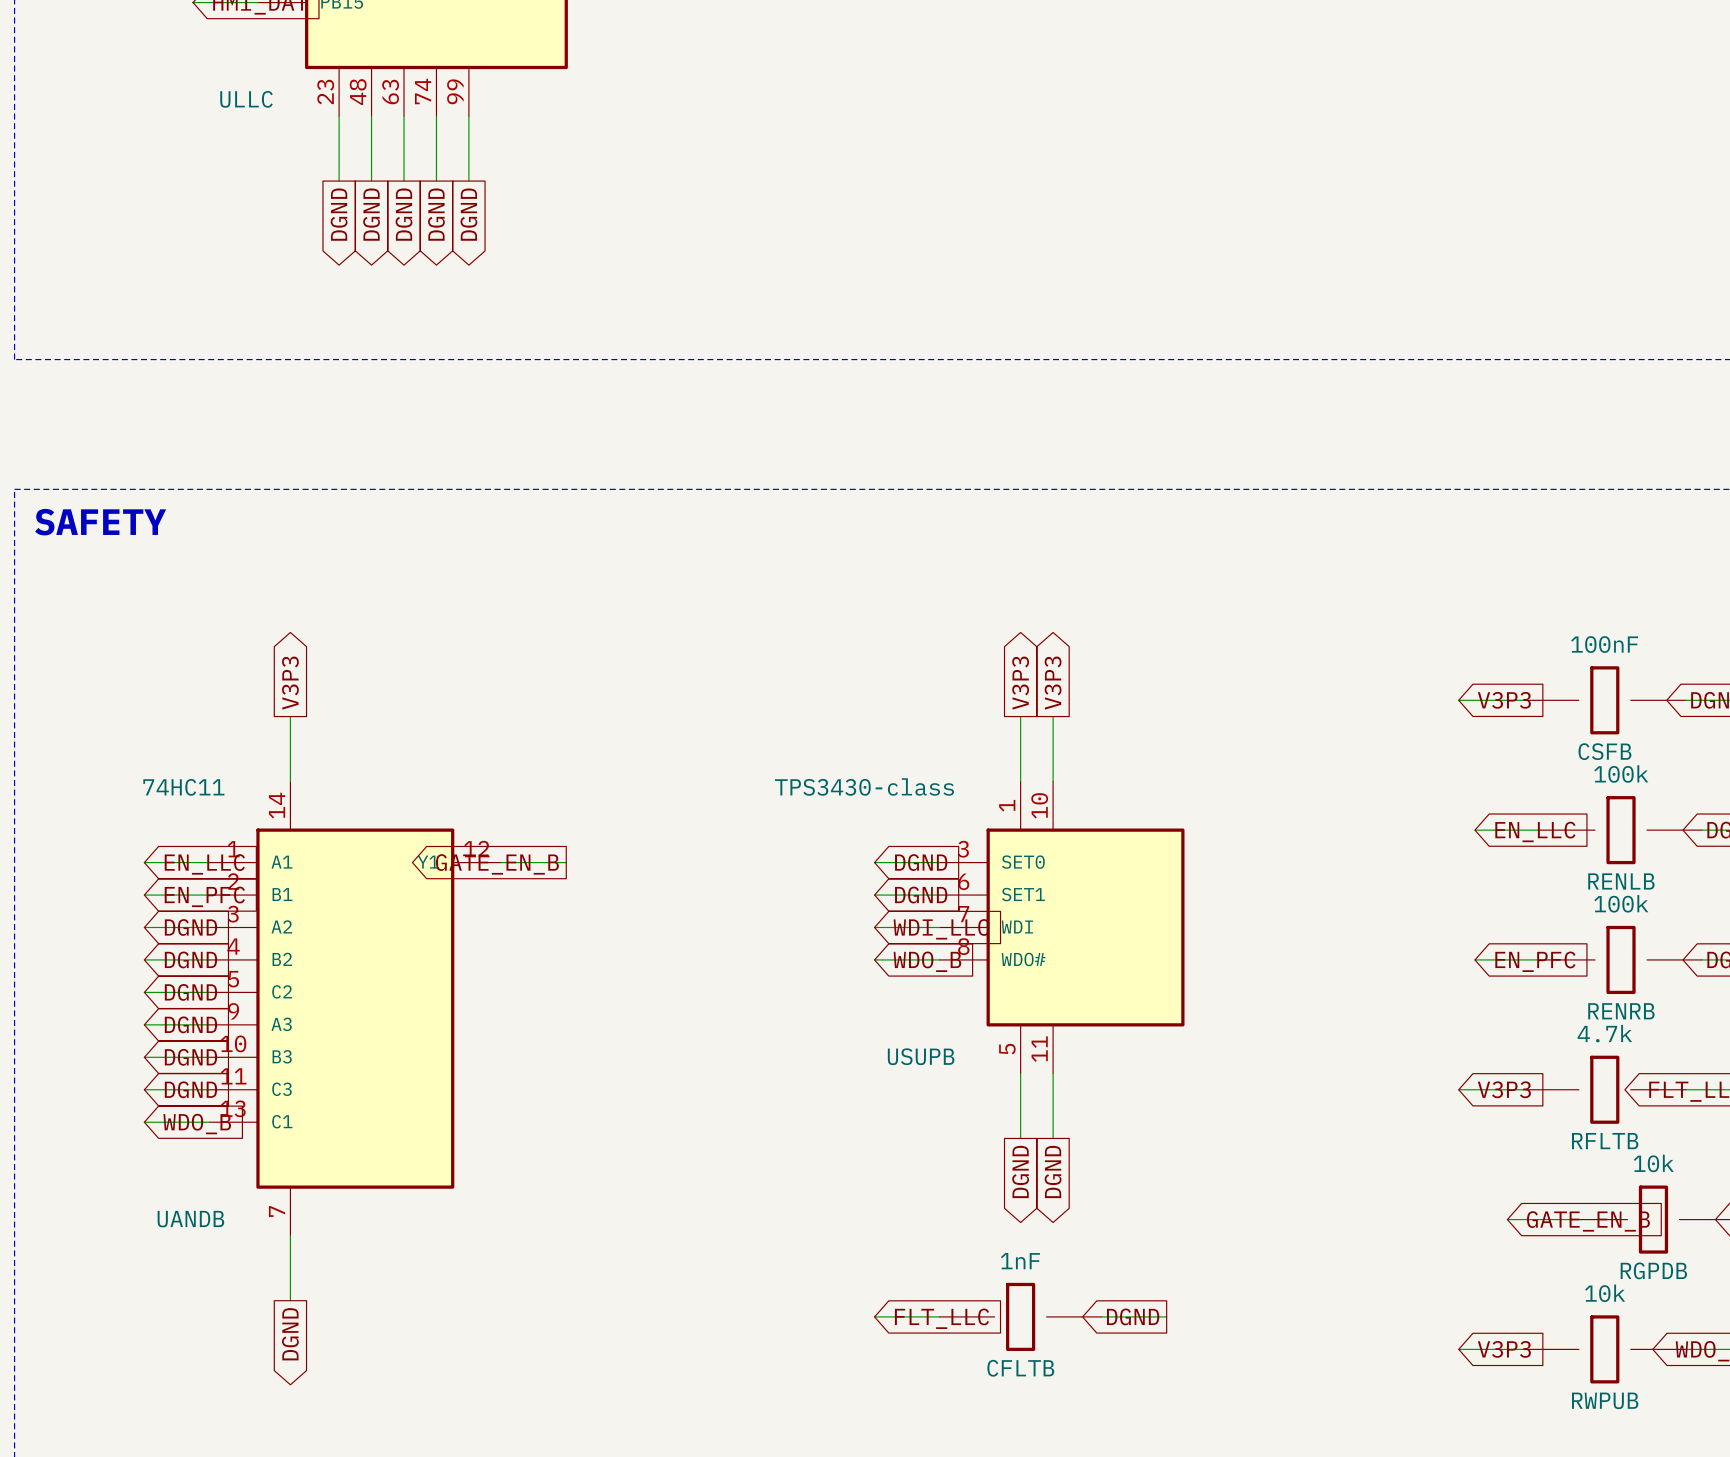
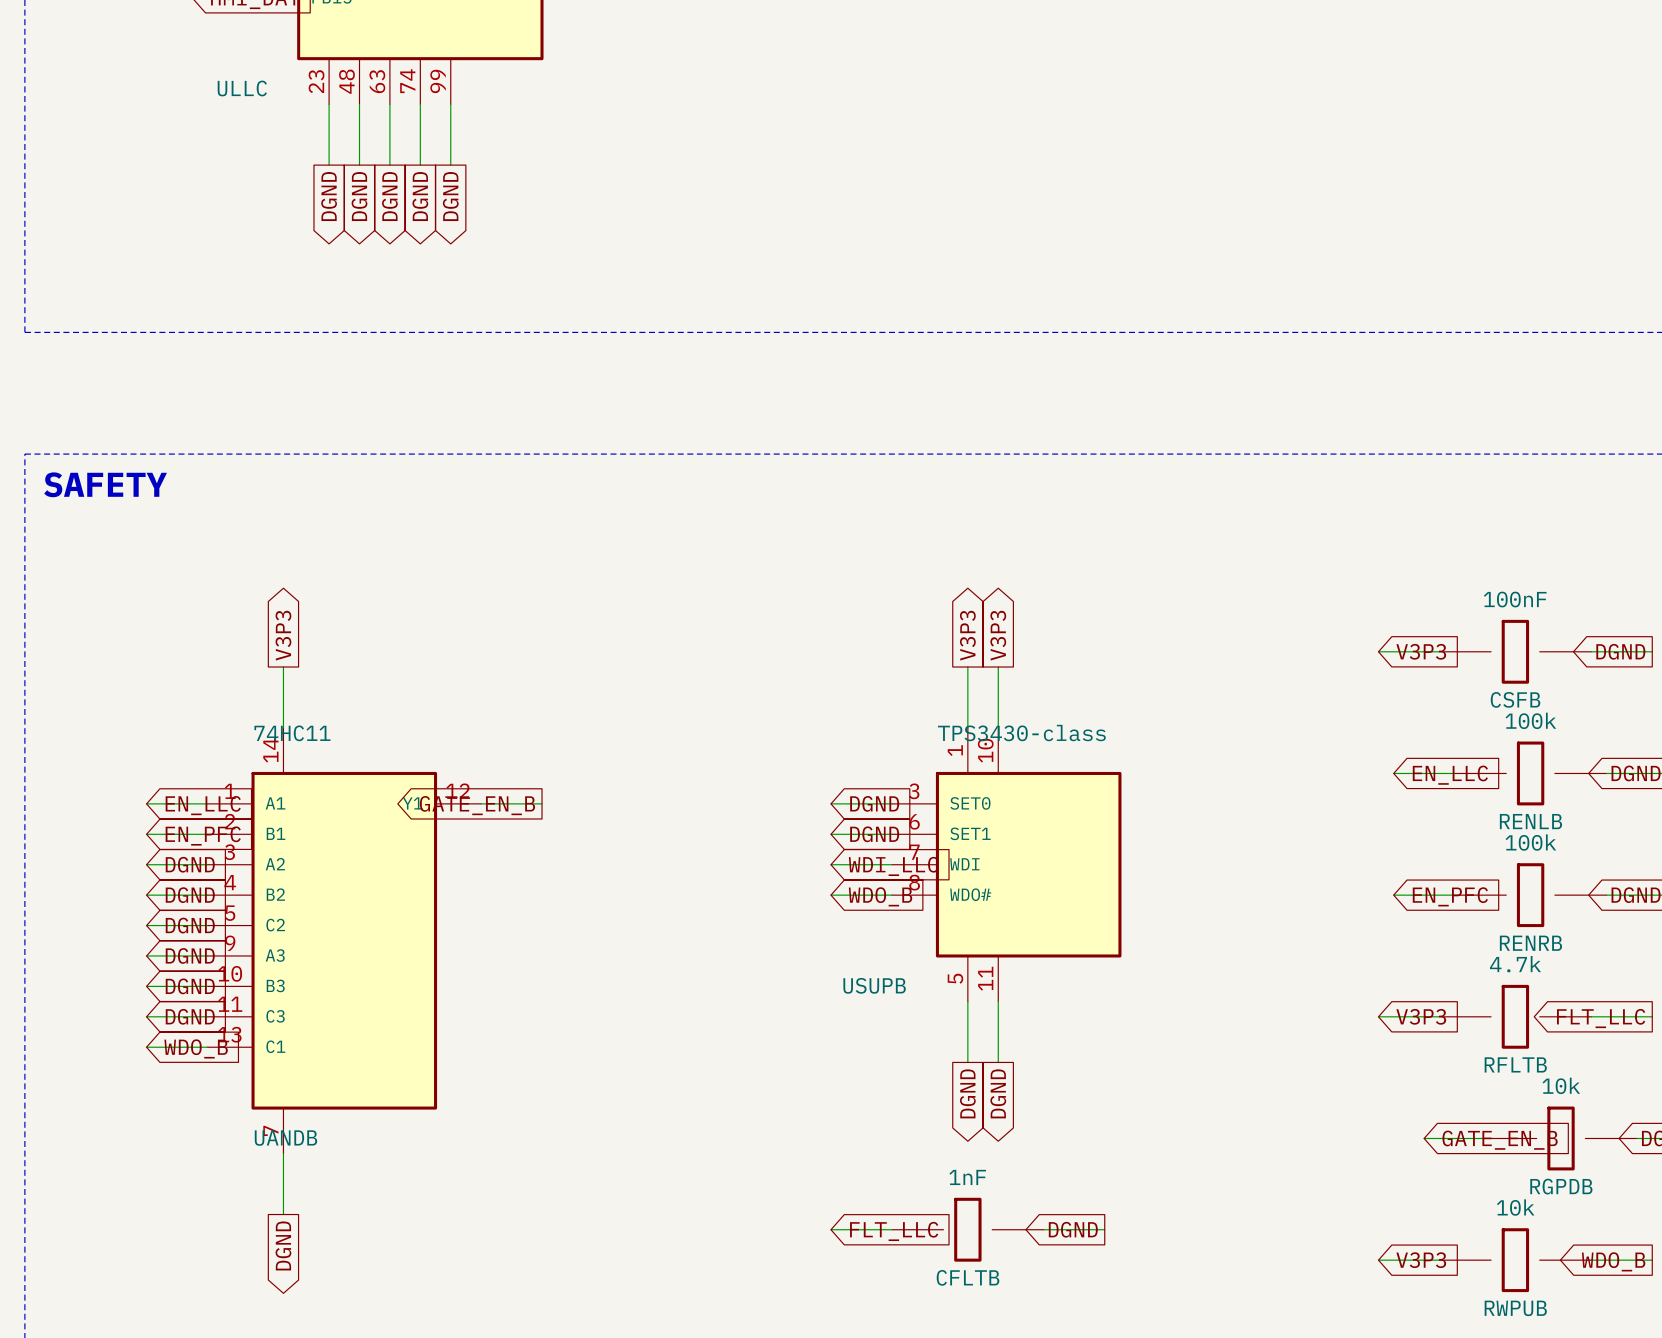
USUPB value position: TPS3430-class (864, 786) -> TPS3430-class (1021, 733)
UANDB value position: 74HC11 (183, 787) -> 74HC11 (292, 733)
UANDB name position: UANDB (190, 1219) -> UANDB (285, 1138)

